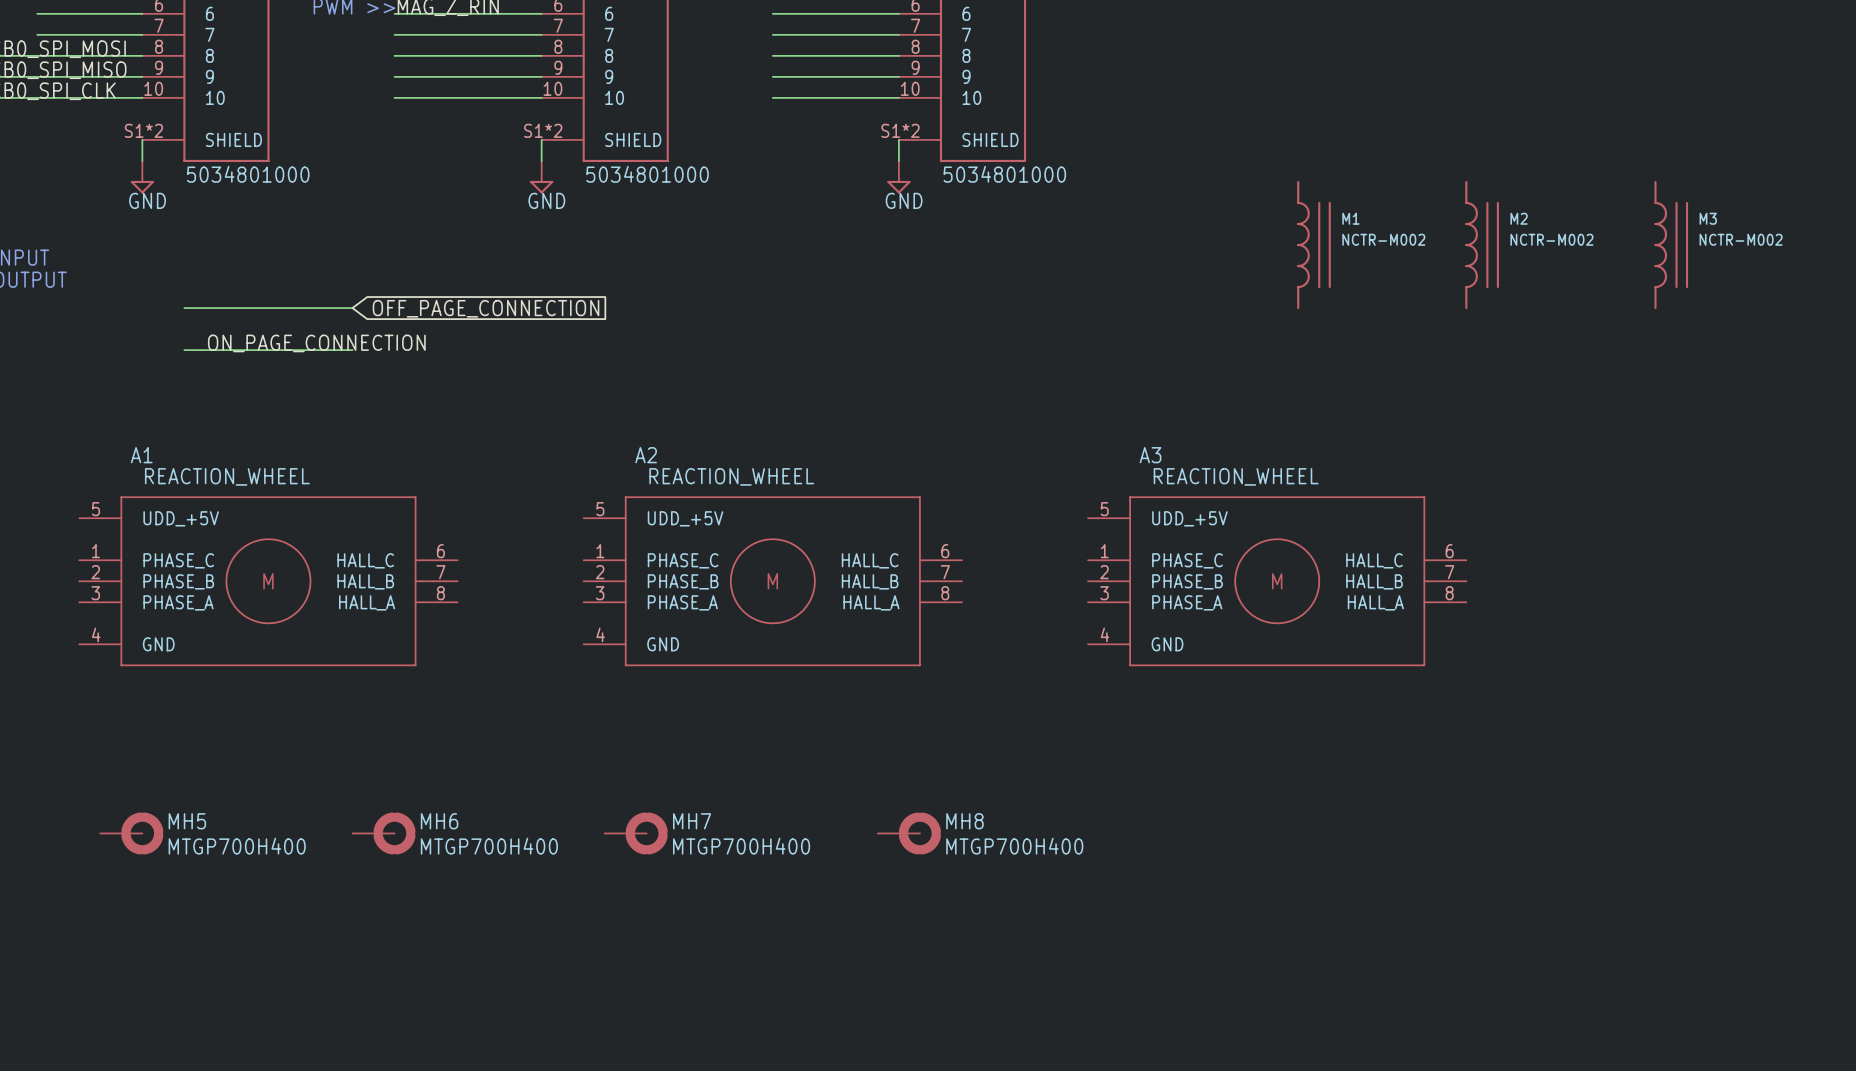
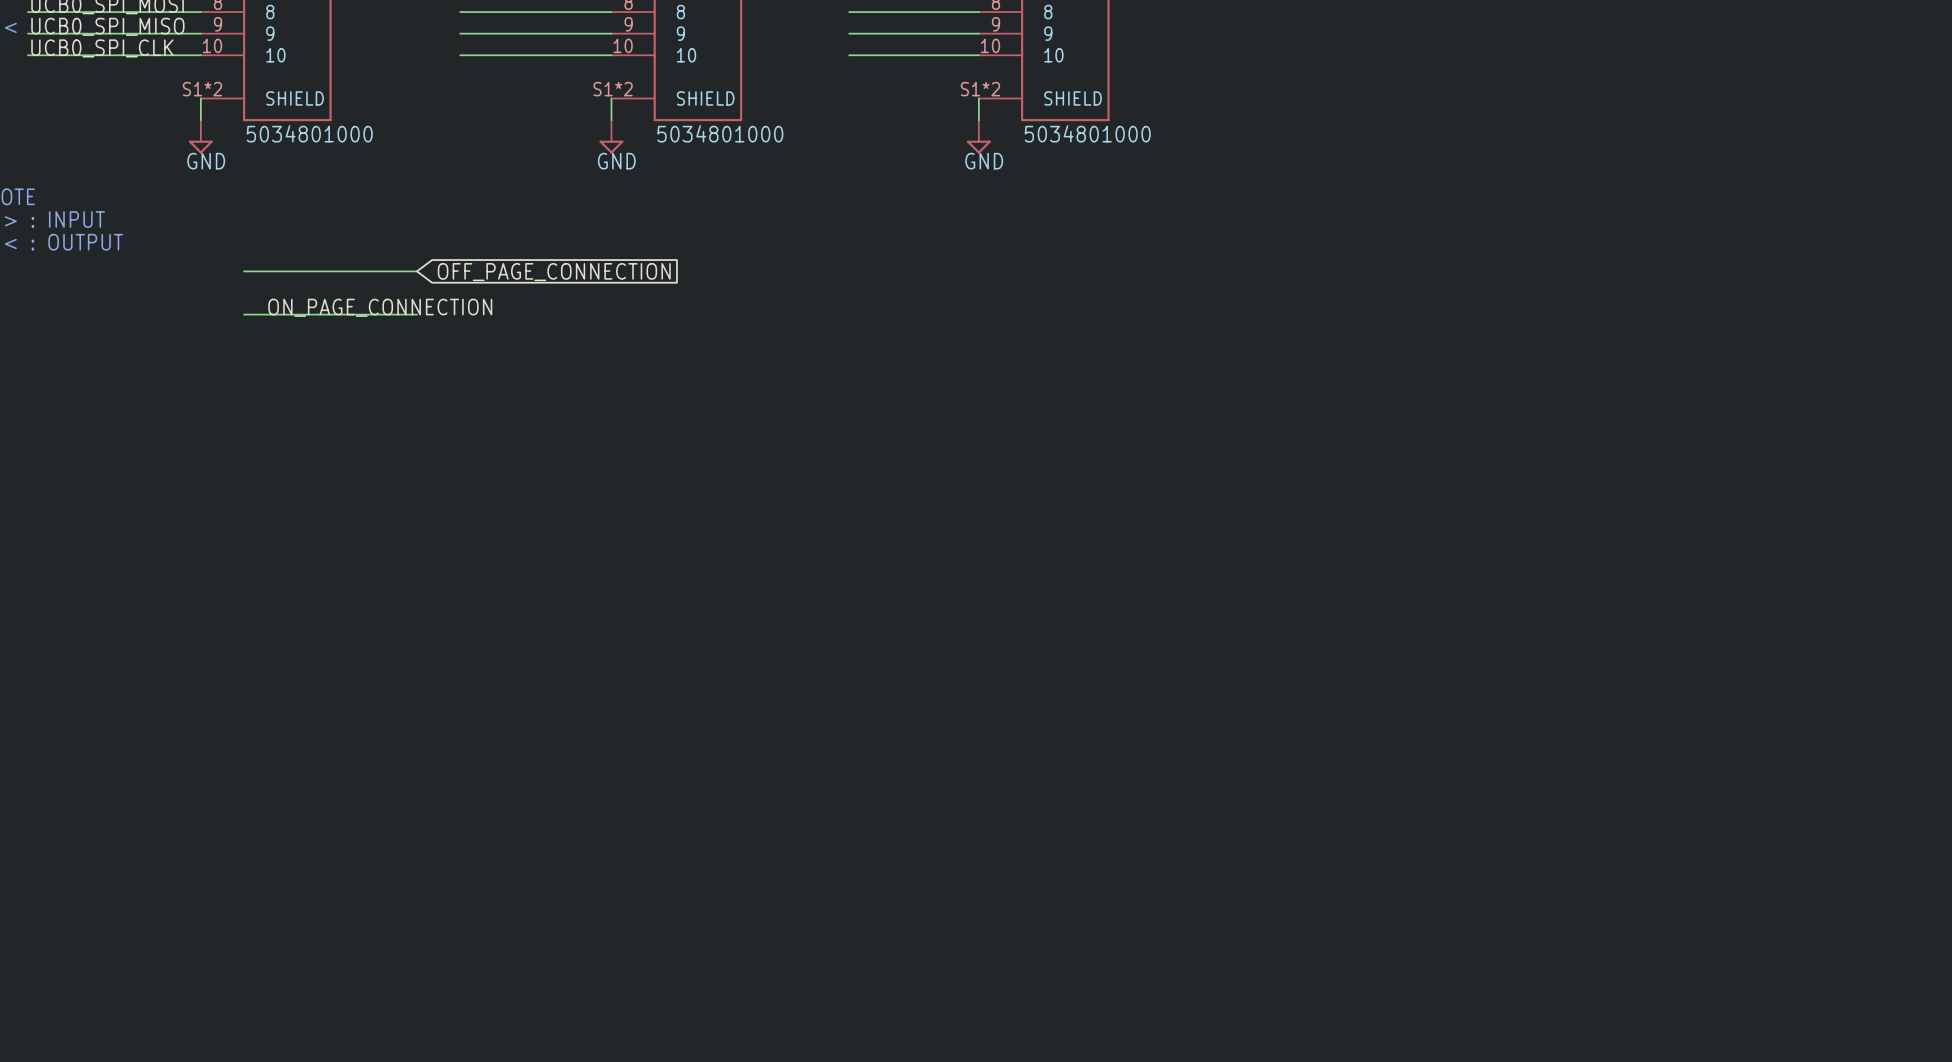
M1: NCTR-M002 (1314, 245) -> none
M2: NCTR-M002 (1482, 245) -> none
M3: NCTR-M002 (1671, 245) -> none
A1: REACTION_WHEEL (268, 581) -> none
A2: REACTION_WHEEL (772, 581) -> none
A3: REACTION_WHEEL (1277, 581) -> none
MH5: MTGP700H400 (131, 833) -> none
MH6: MTGP700H400 (384, 833) -> none
MH7: MTGP700H400 (636, 833) -> none
MH8: MTGP700H400 (909, 833) -> none

